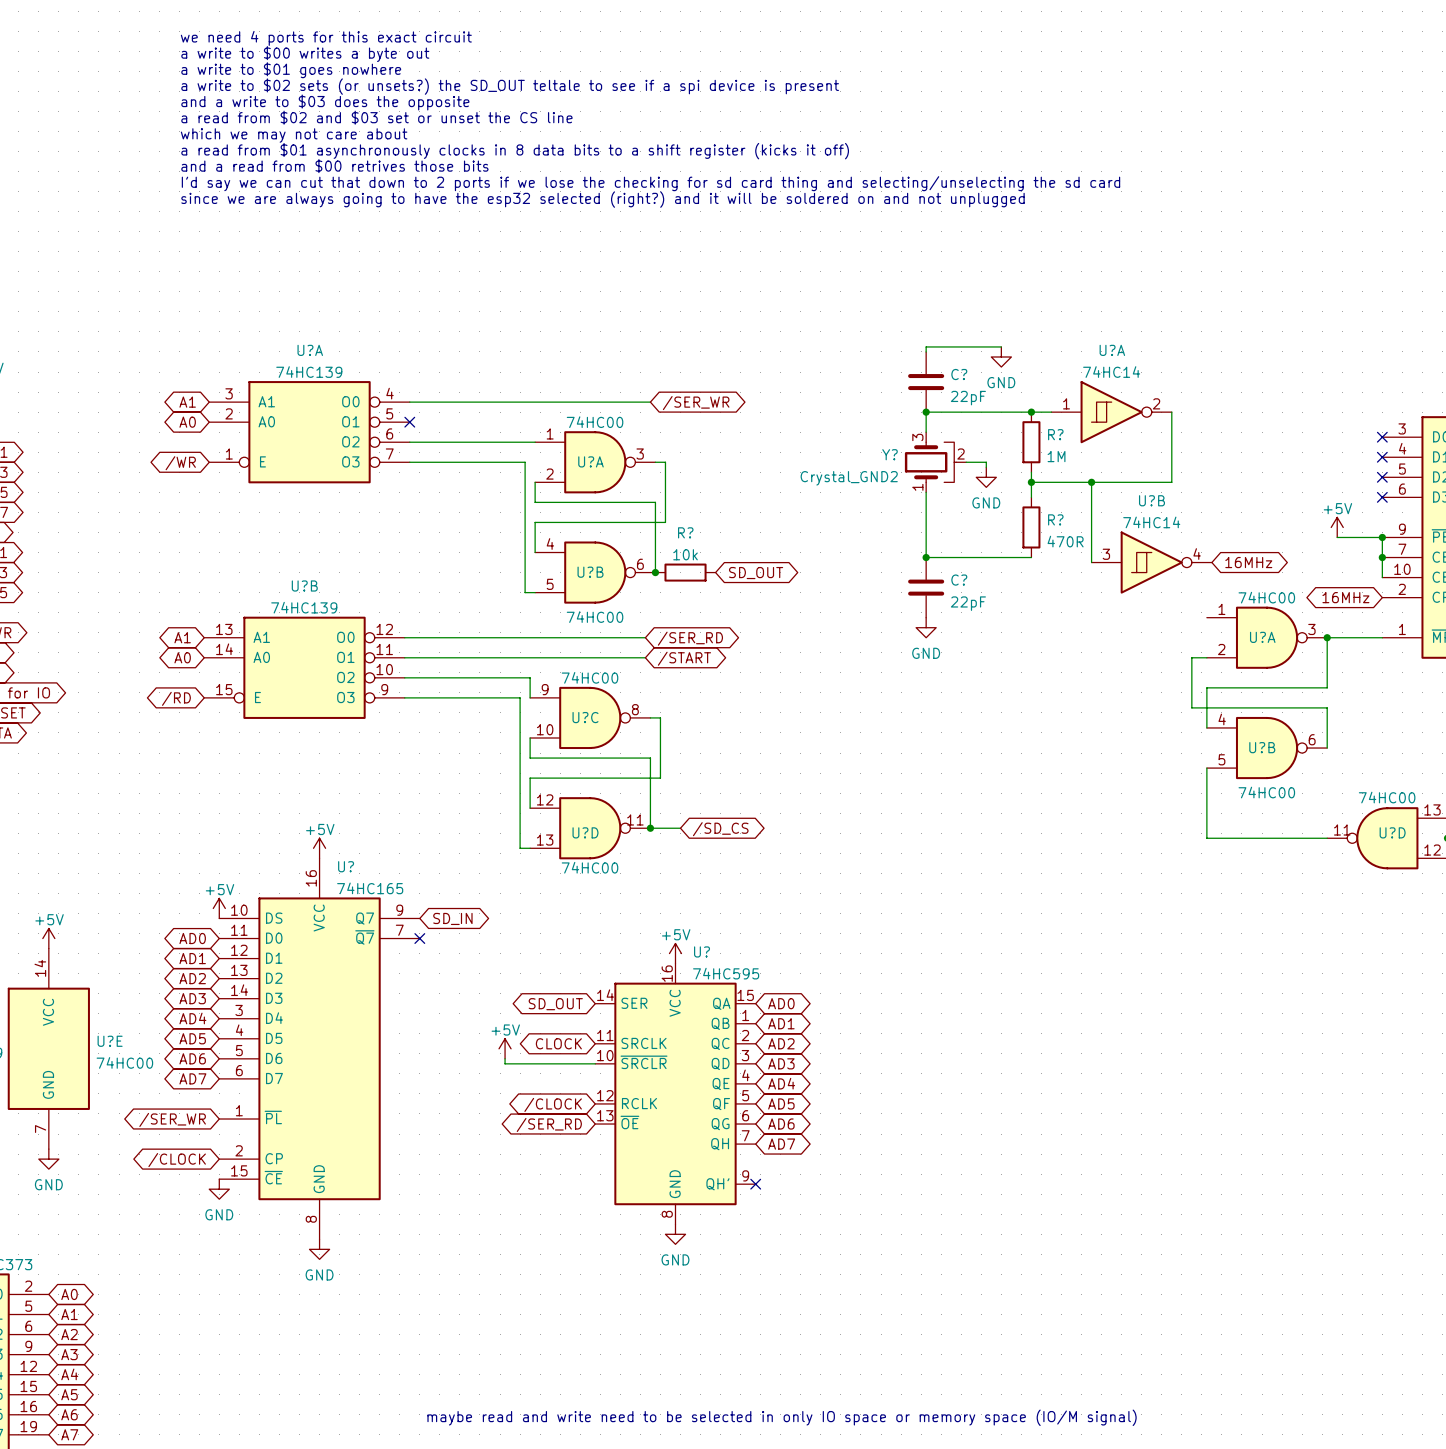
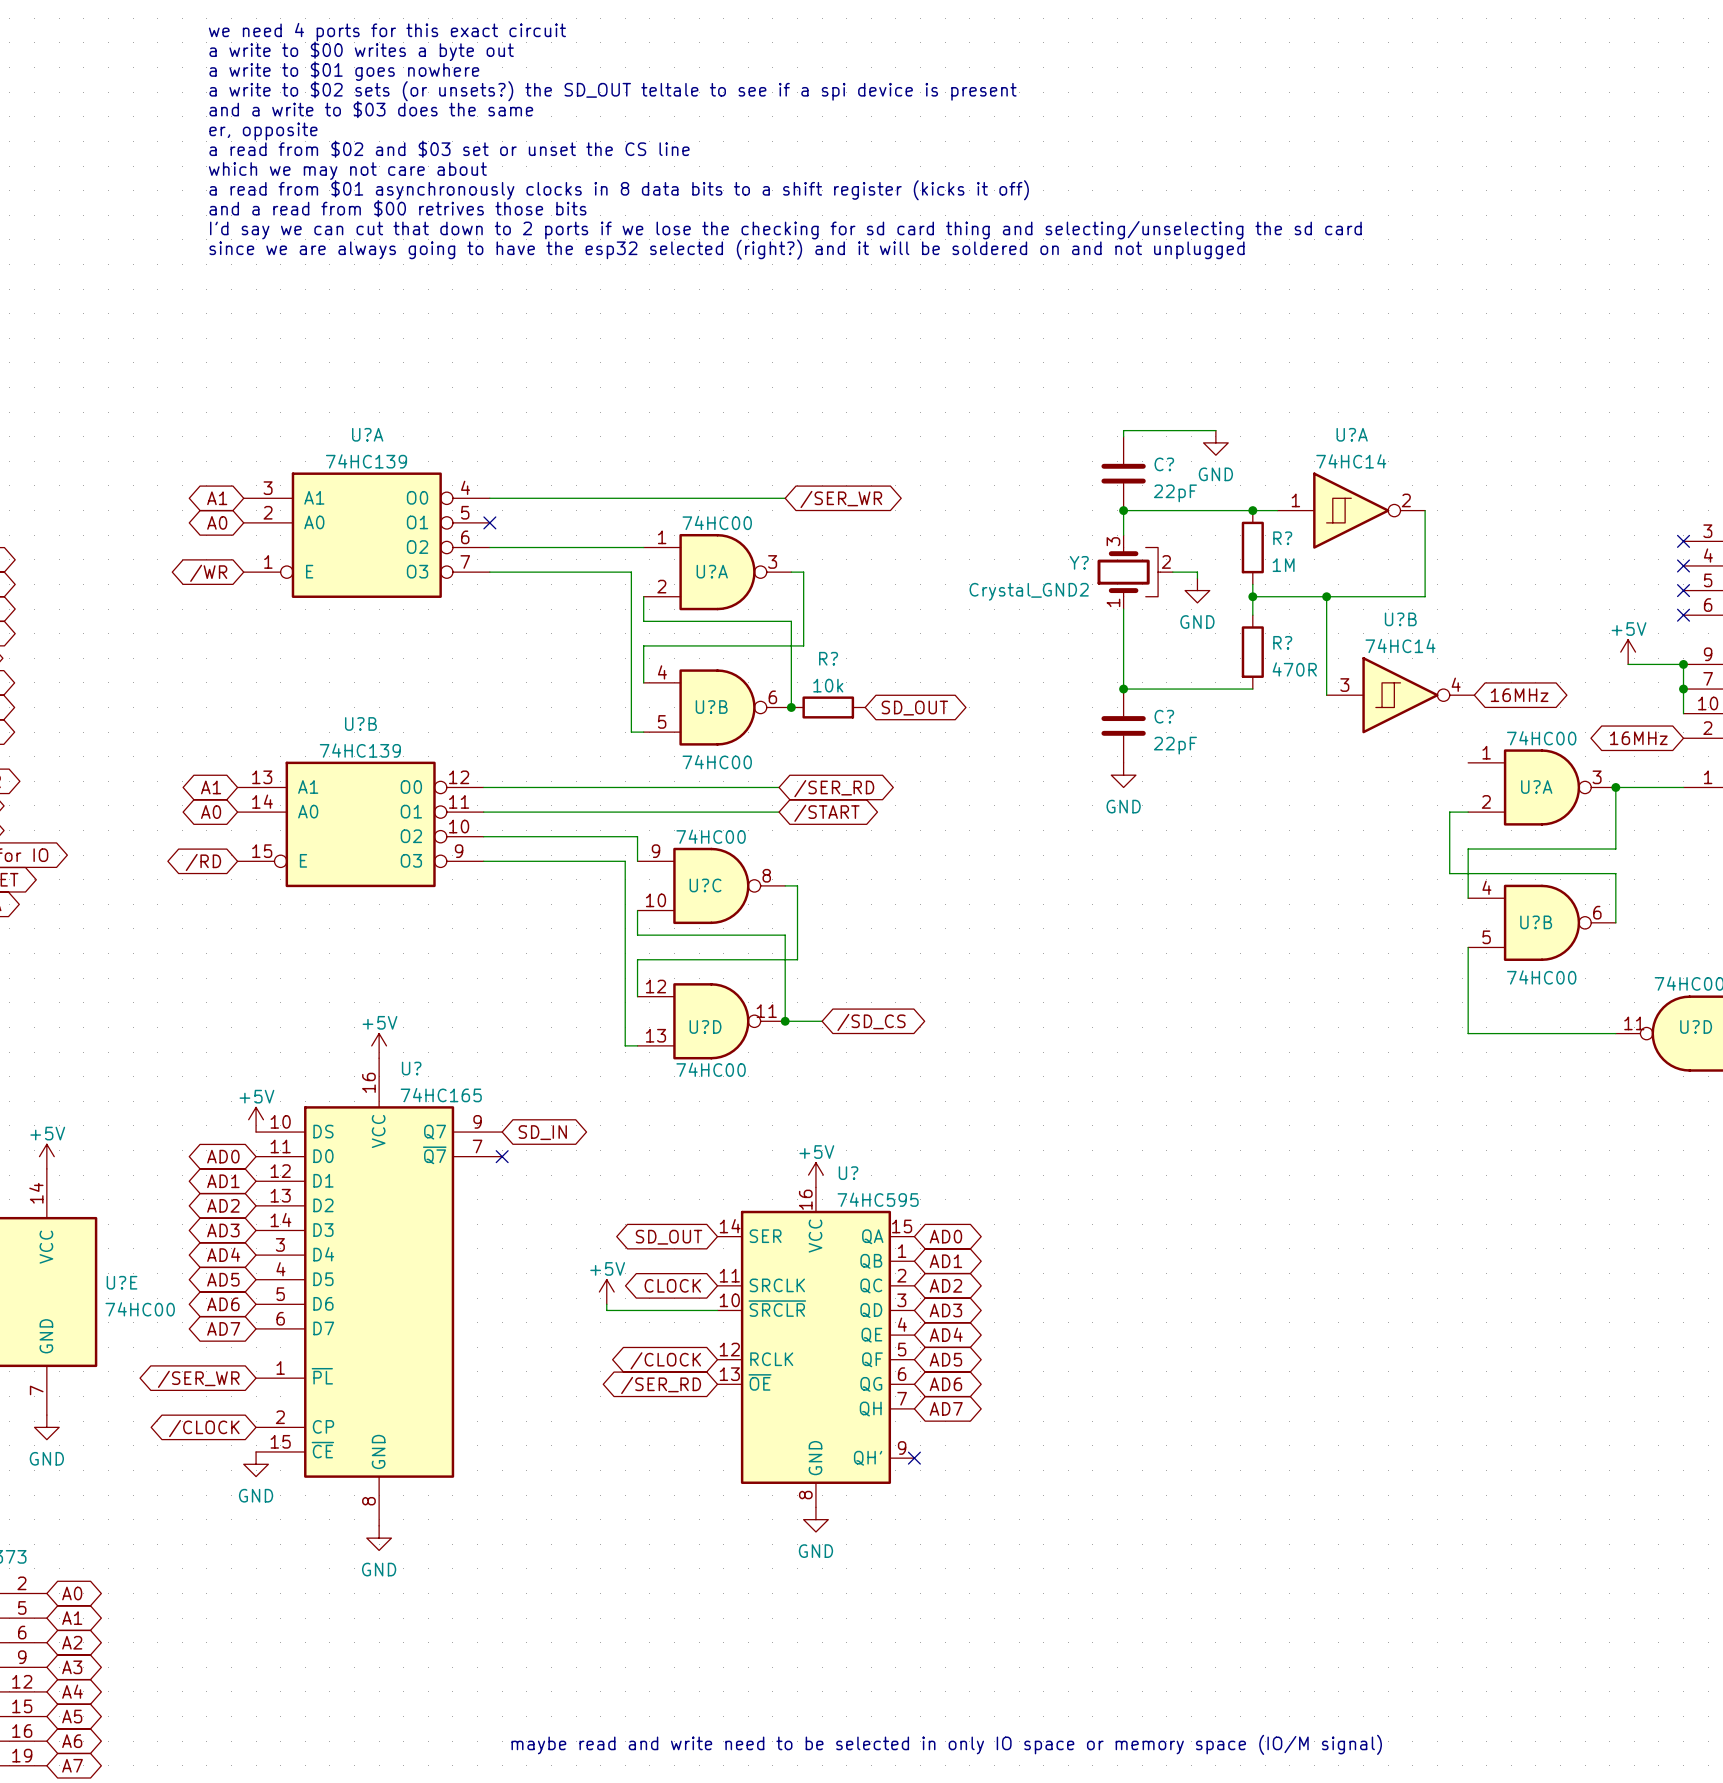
text: none -> we need 4 ports for this exact circuit (387, 32)
text: we need 4 ports for this exact circuit (326, 38) -> a write to $00 writes a byte out (361, 51)
text: a write to $00 writes a byte out (305, 54) -> a write to $01 goes nowhere (344, 71)
text: a write to $01 goes nowhere (291, 70) -> a write to $02 sets (or unsets?) the SD_OUT teltale to see if a spi device is present (613, 91)
text: a write to $02 sets (or unsets?) the SD_OUT teltale to see if a spi device is present (510, 86) -> and a write to $03 does the same (371, 109)
text: and a write to $03 does the opposite (325, 102) -> er, opposite (263, 131)

